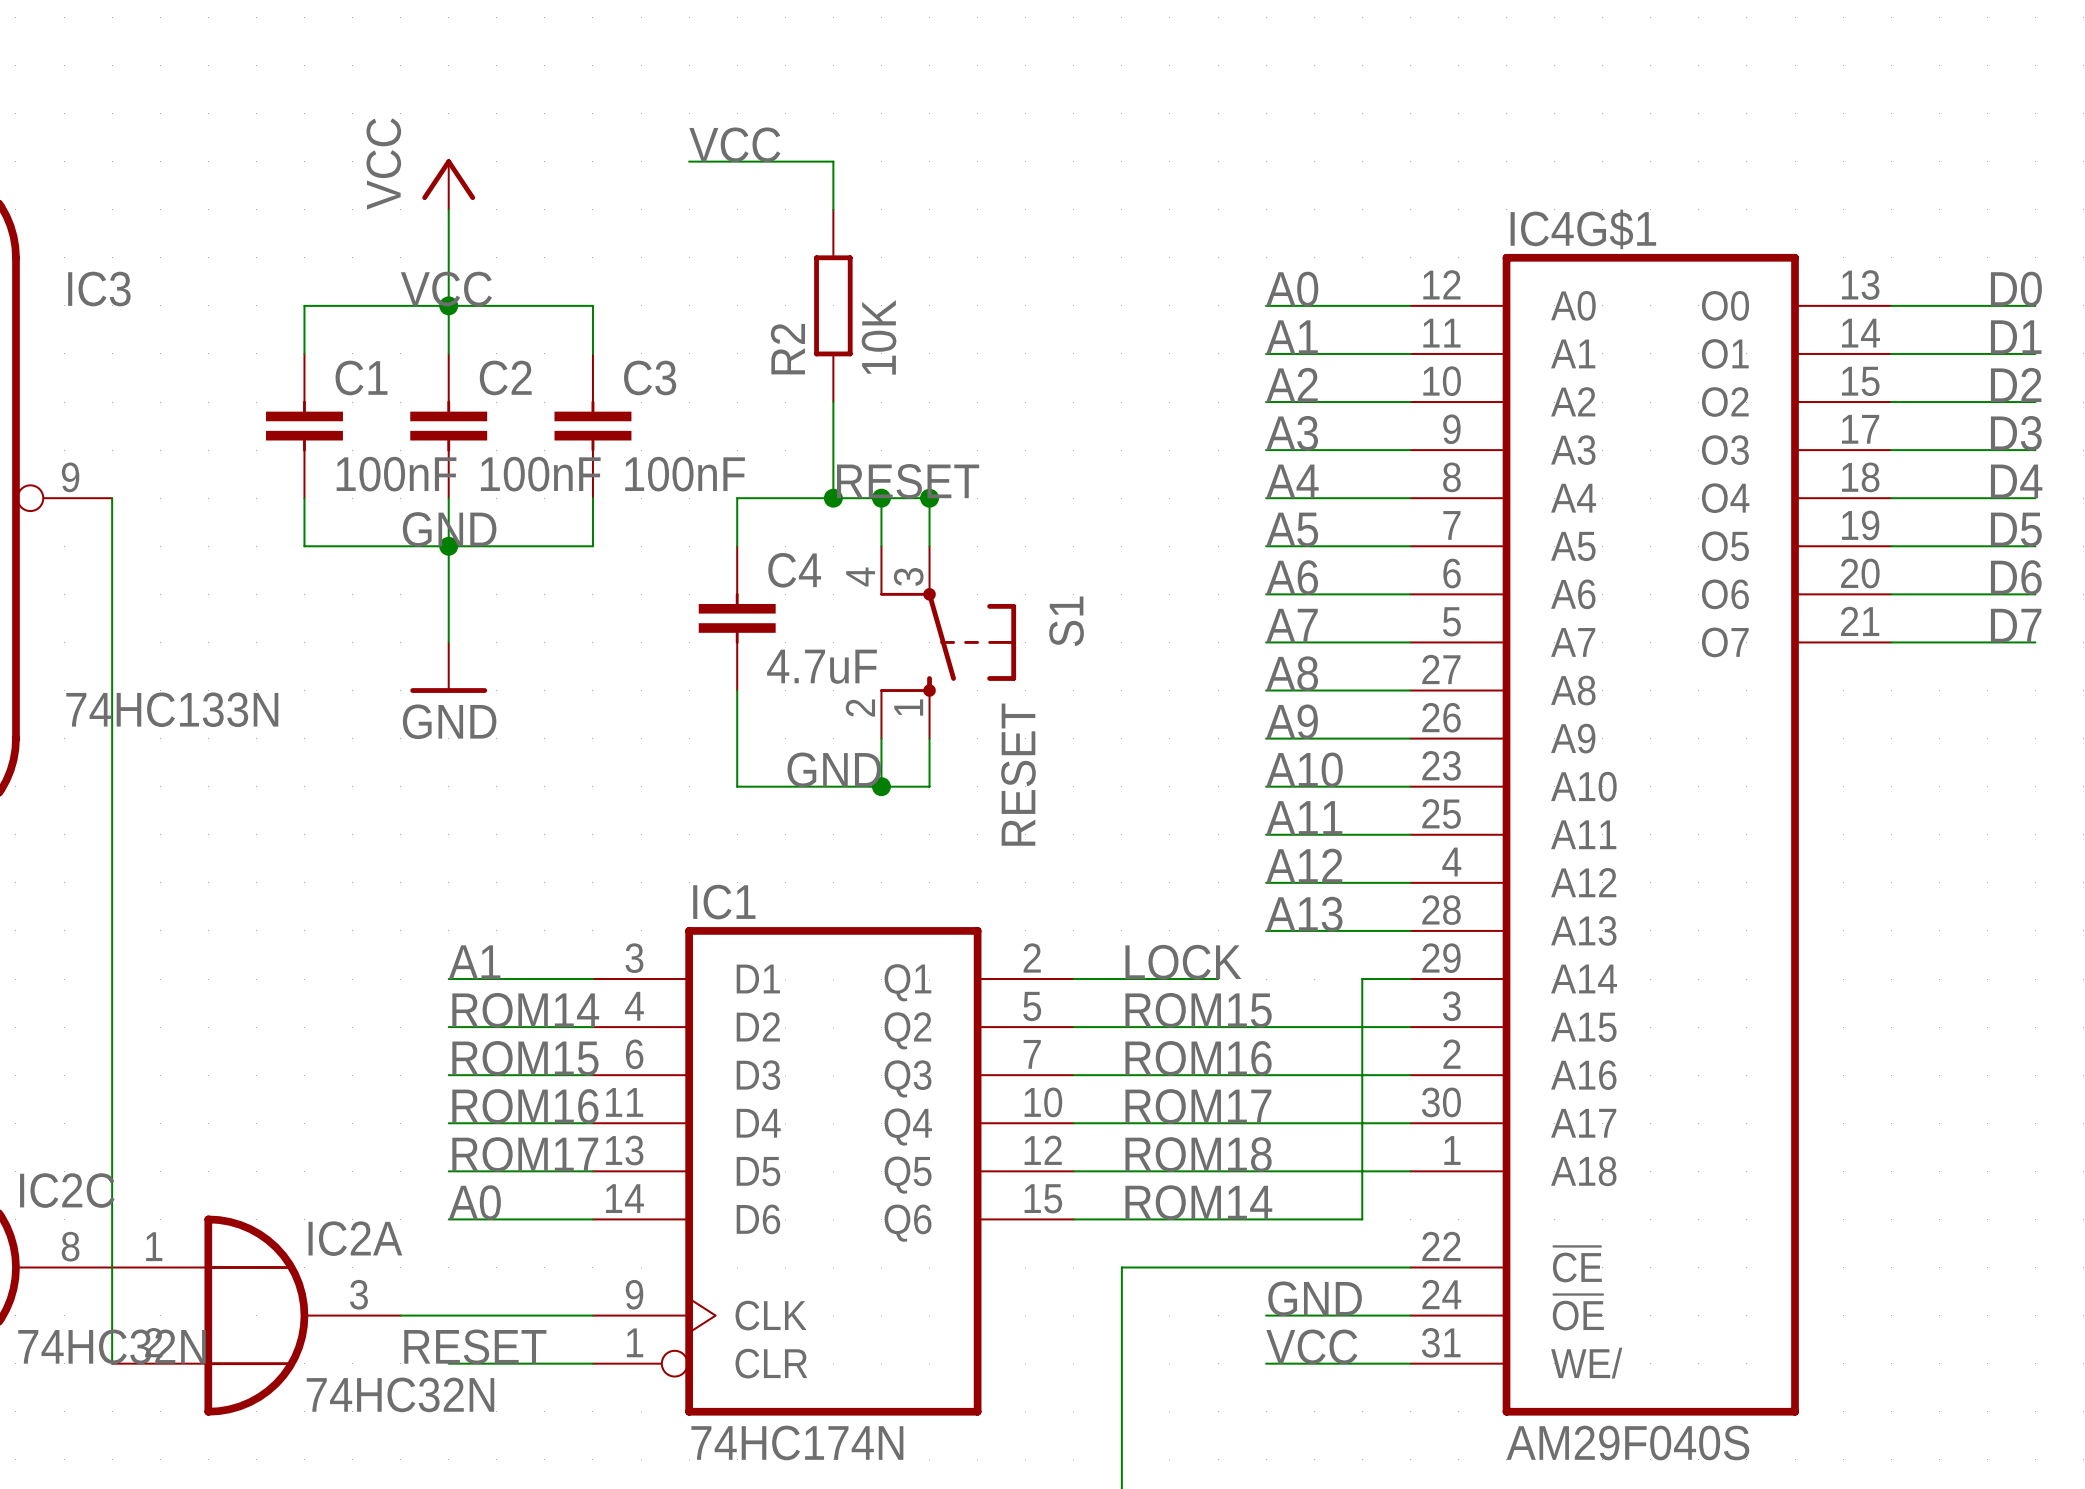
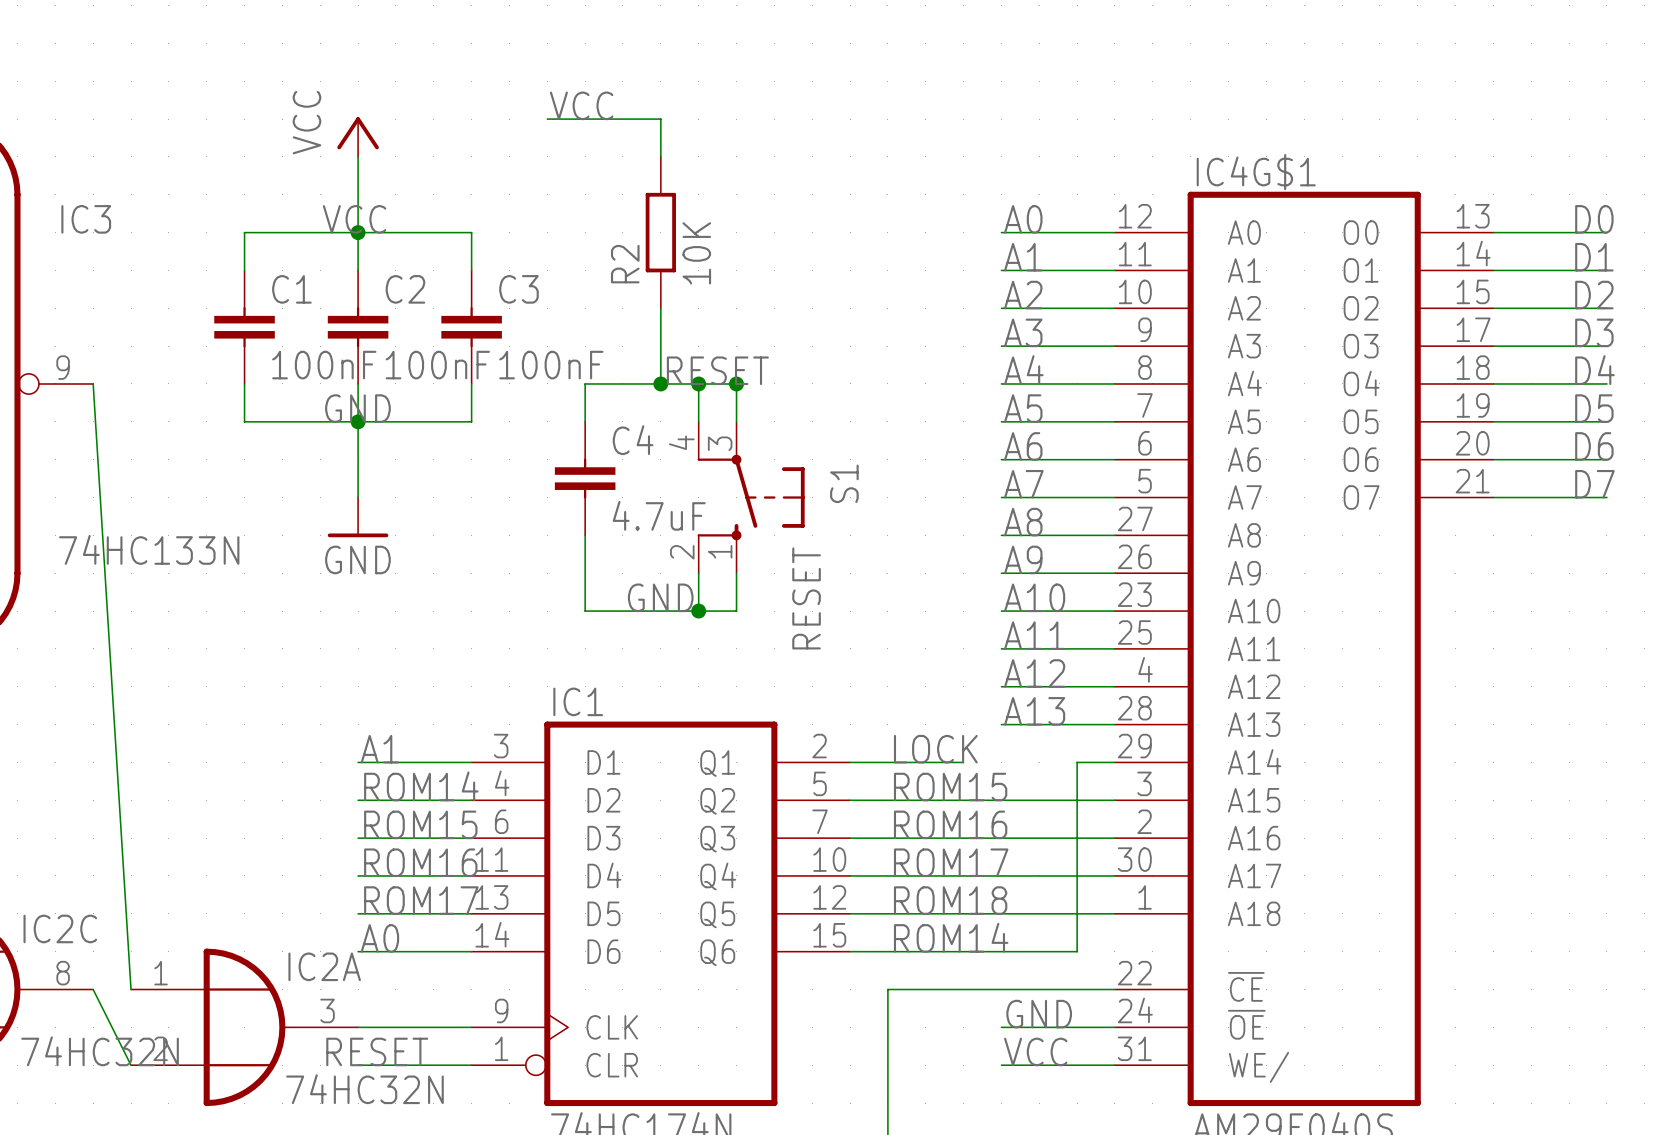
wire: (112, 498) (112, 1363) -> (93, 383) (131, 989)
wire: none -> (93, 989) (131, 1065)
IC2A position: (256, 1315) -> (244, 1027)

